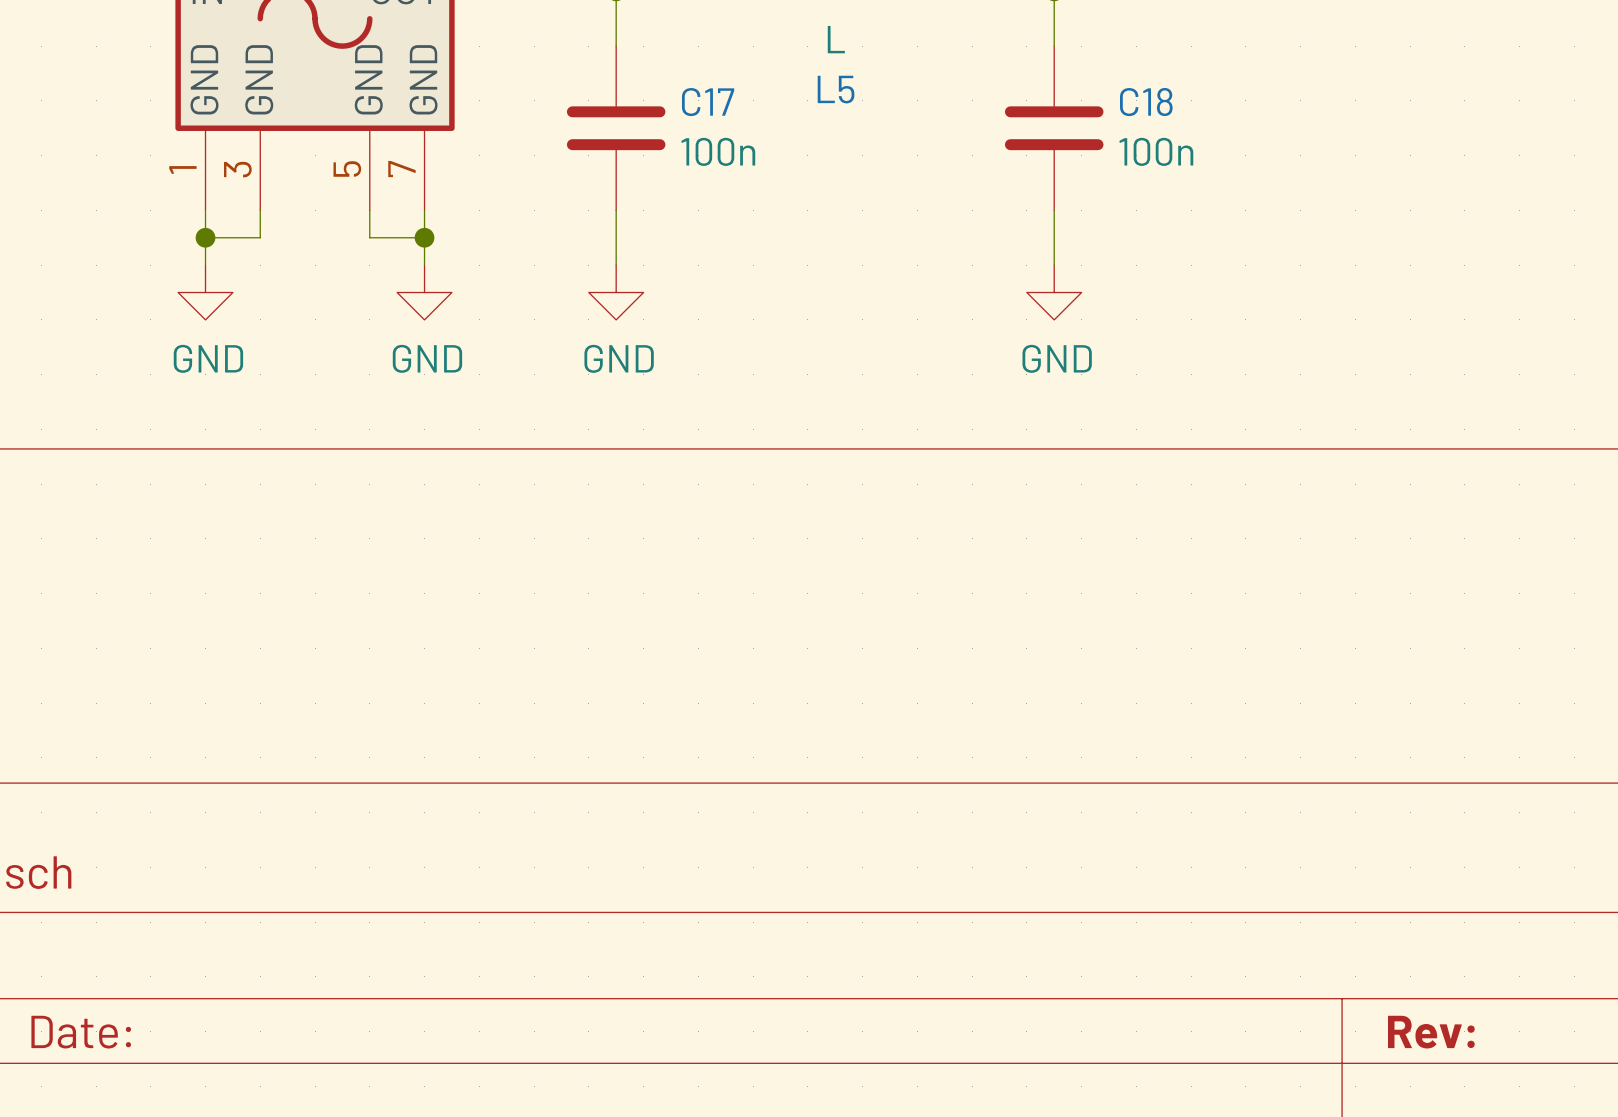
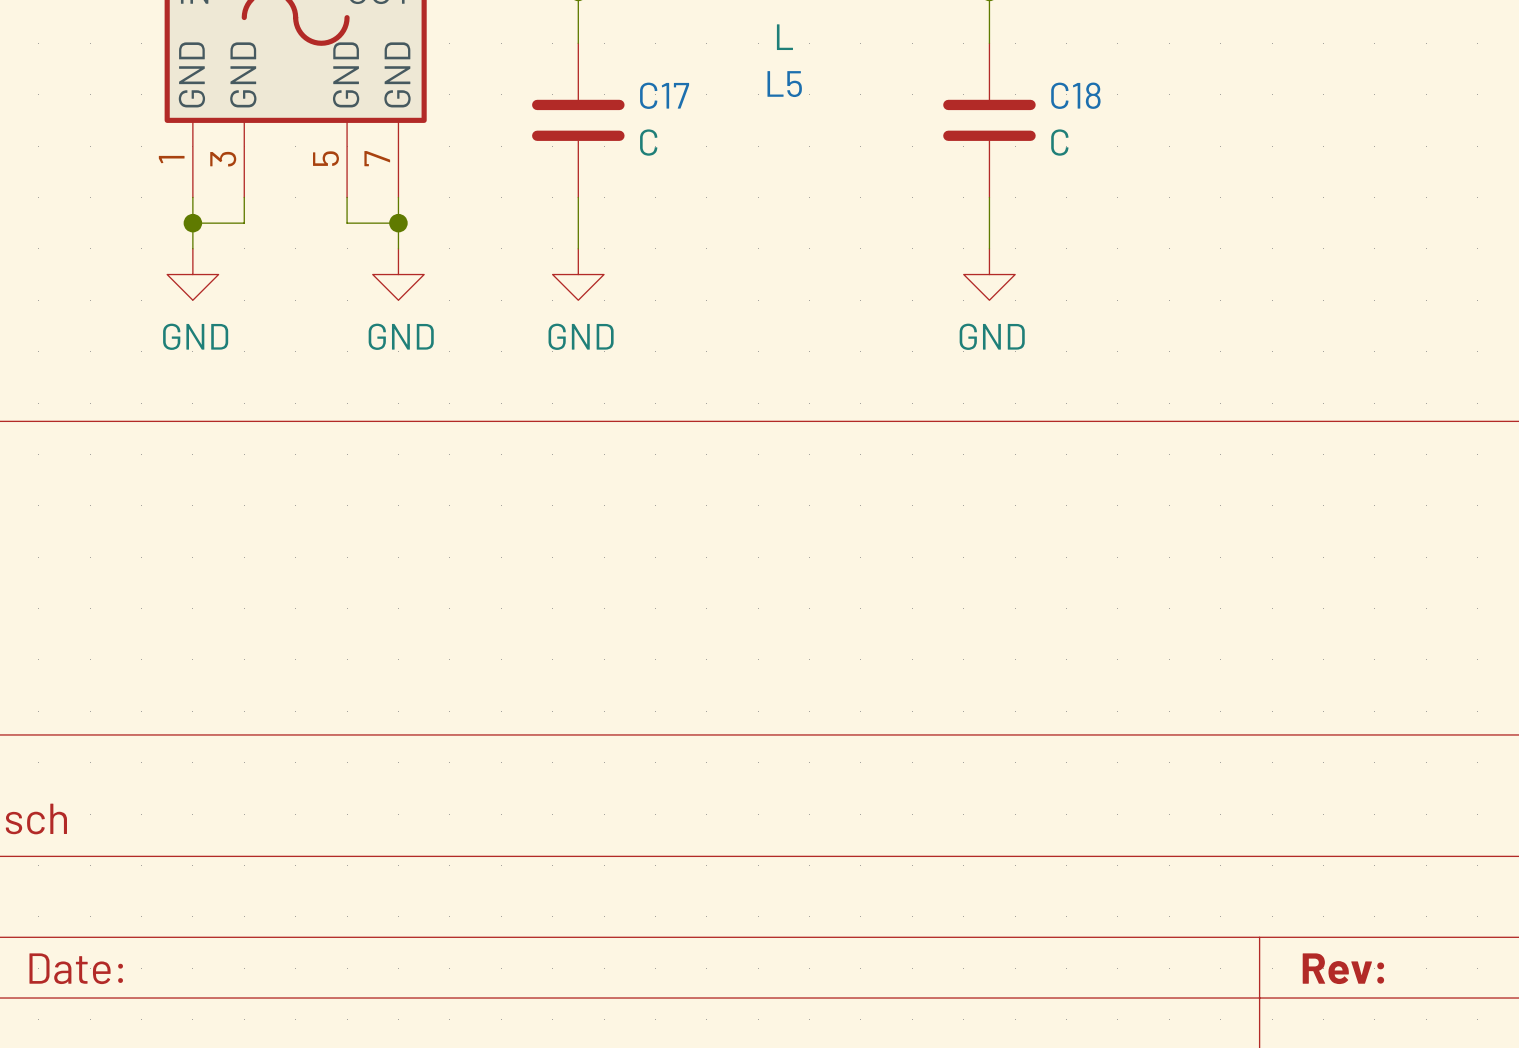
C17 value: 100n (718, 151) -> C (648, 142)
C18 value: 100n (1156, 151) -> C (1059, 142)

